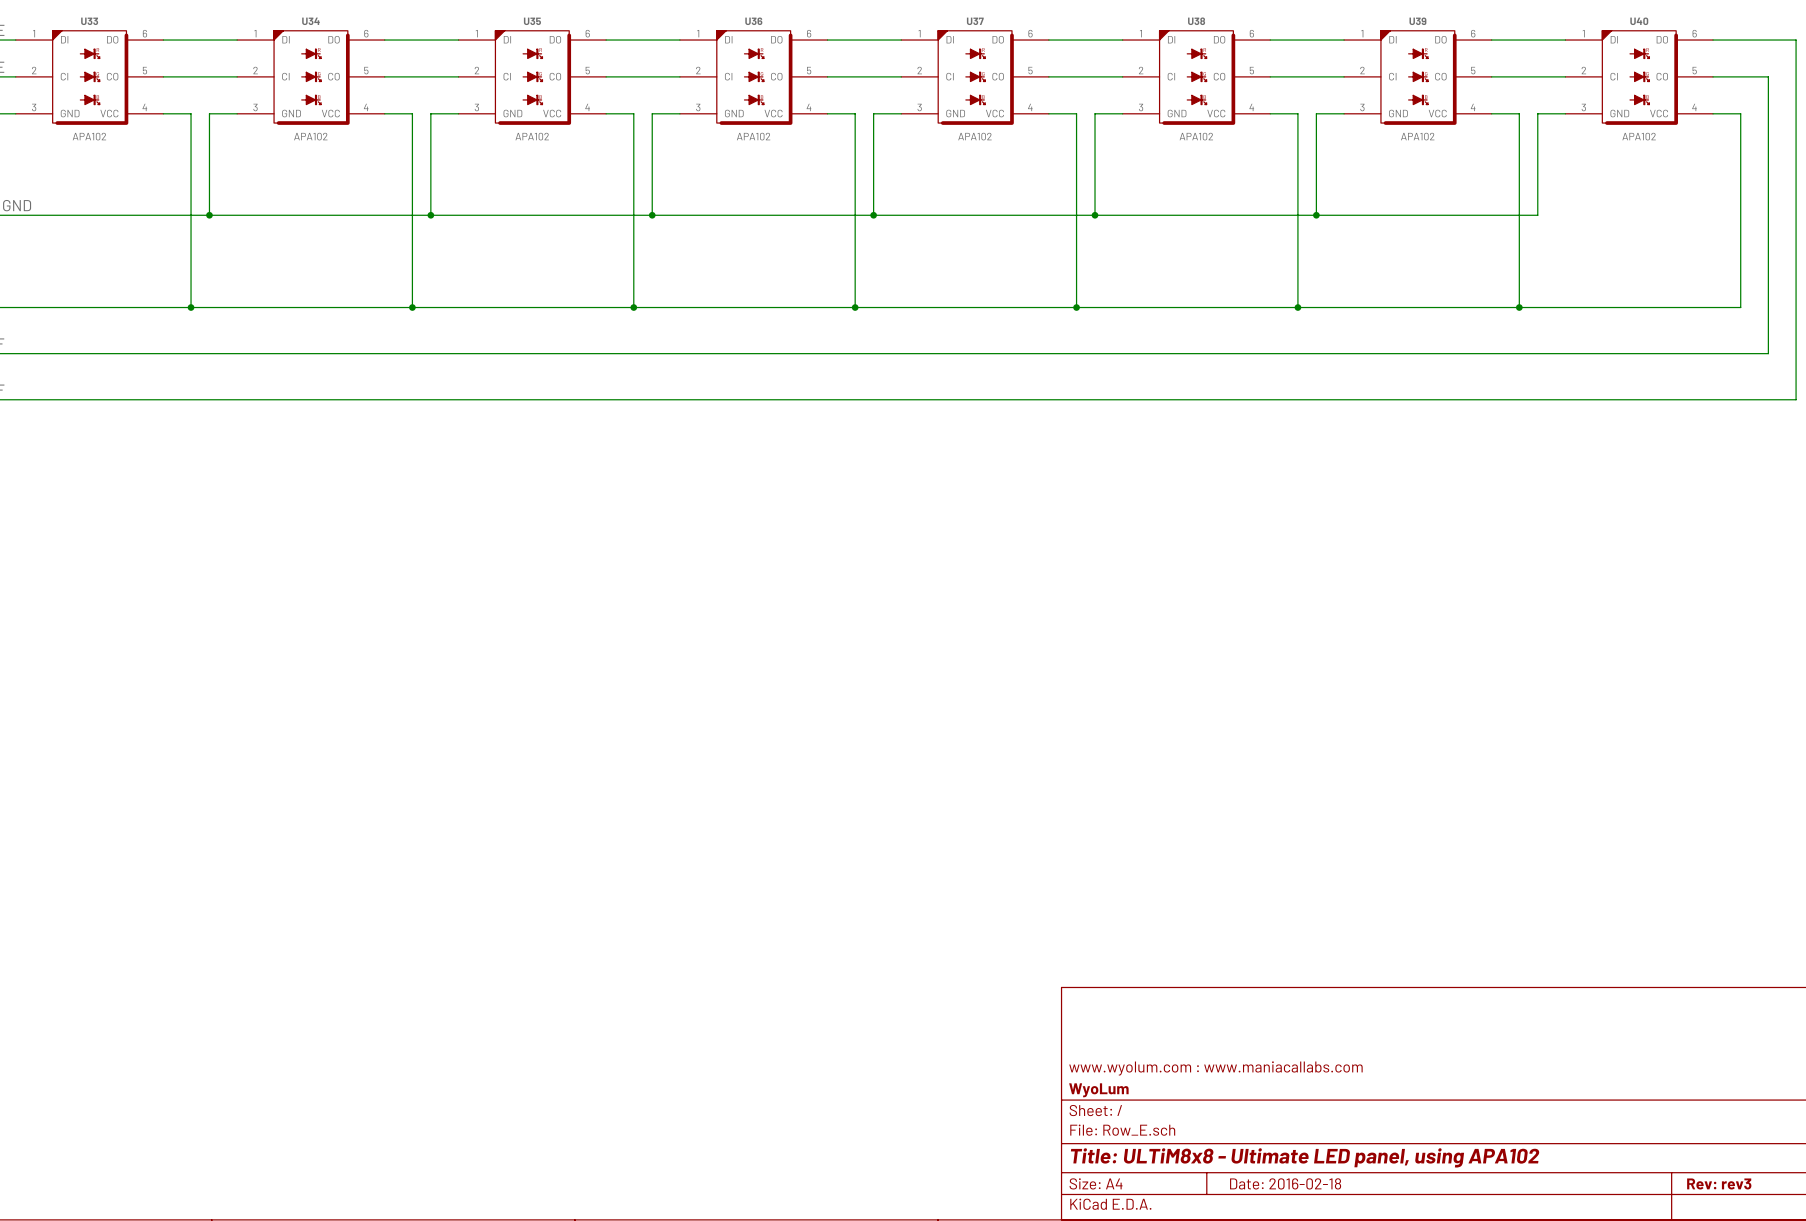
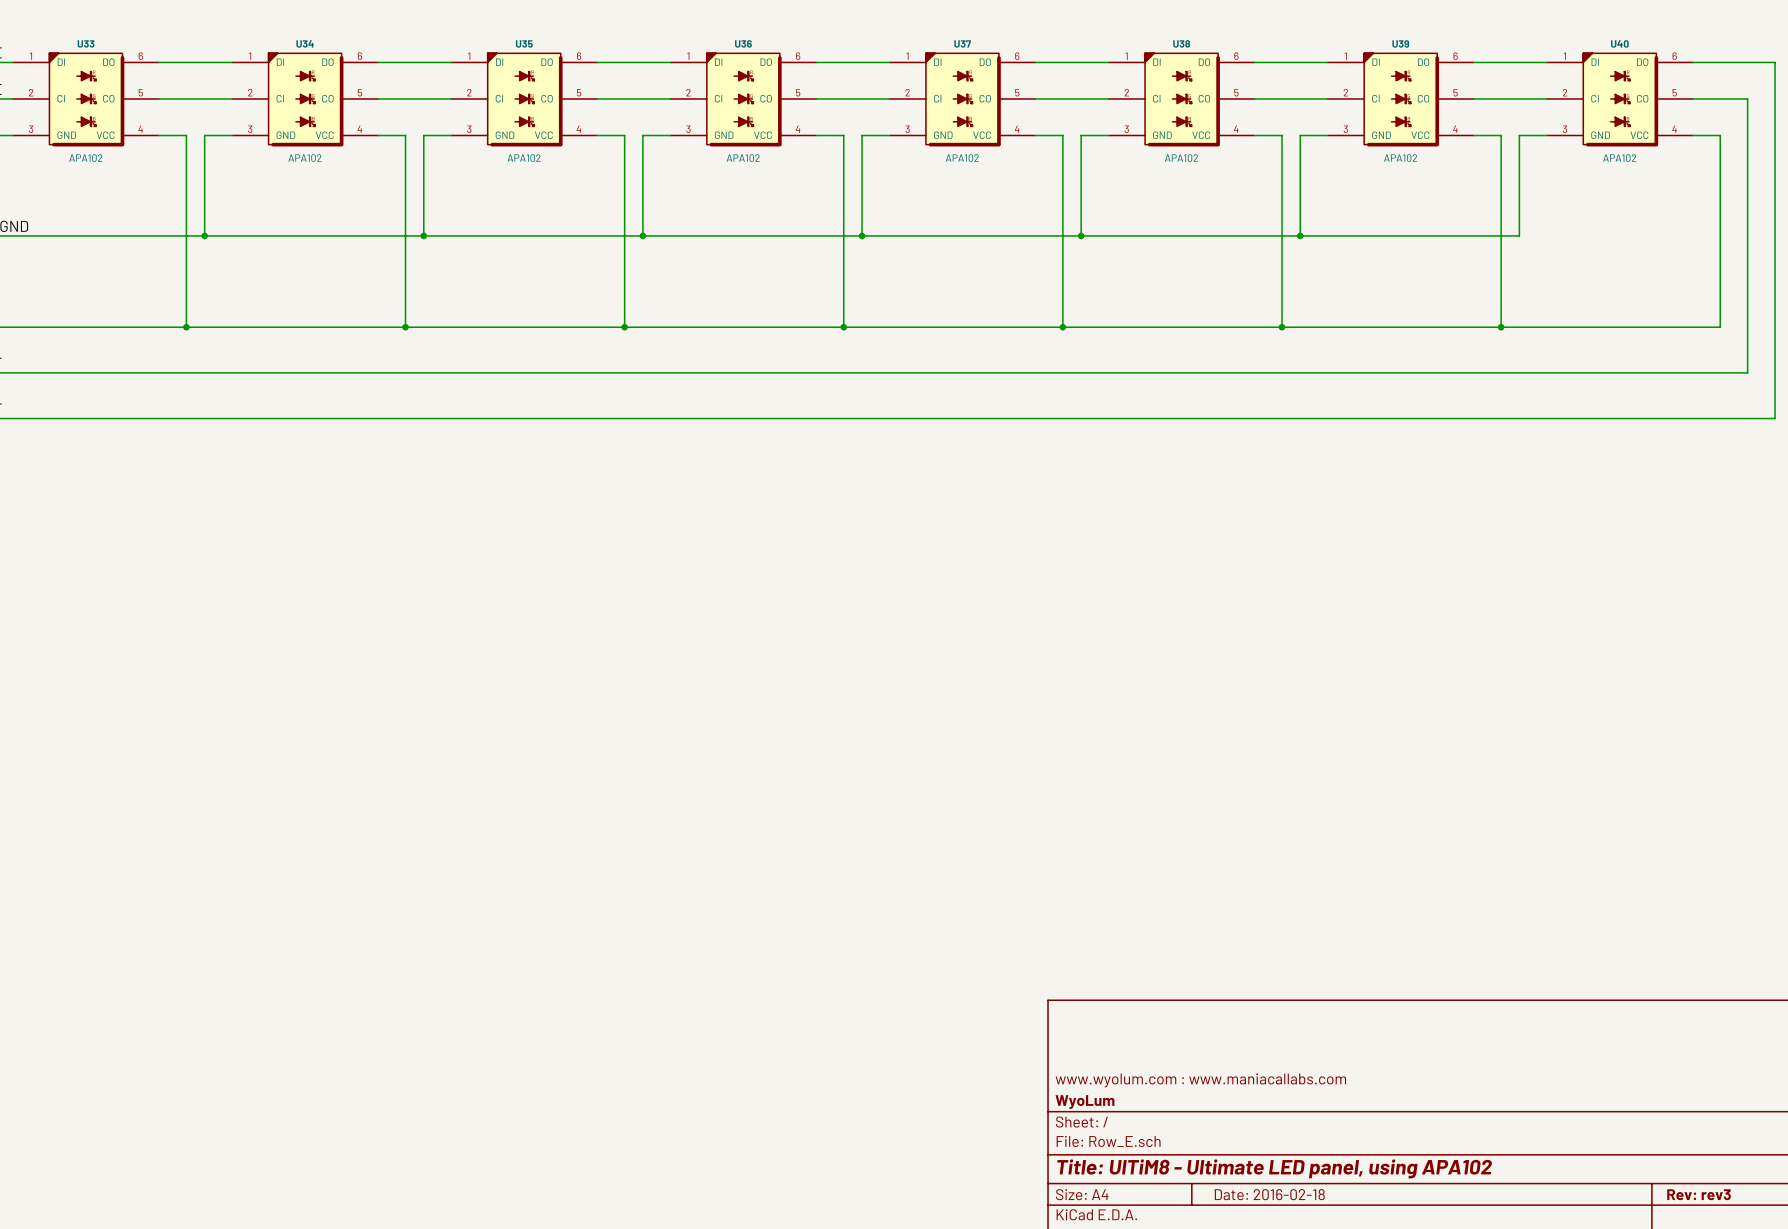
title block: Title: ULTiM8x8 - Ultimate LED panel, using APA102 (1305, 1157) -> Title: UlTiM8 - Ultimate LED panel, using APA102 (1274, 1168)

